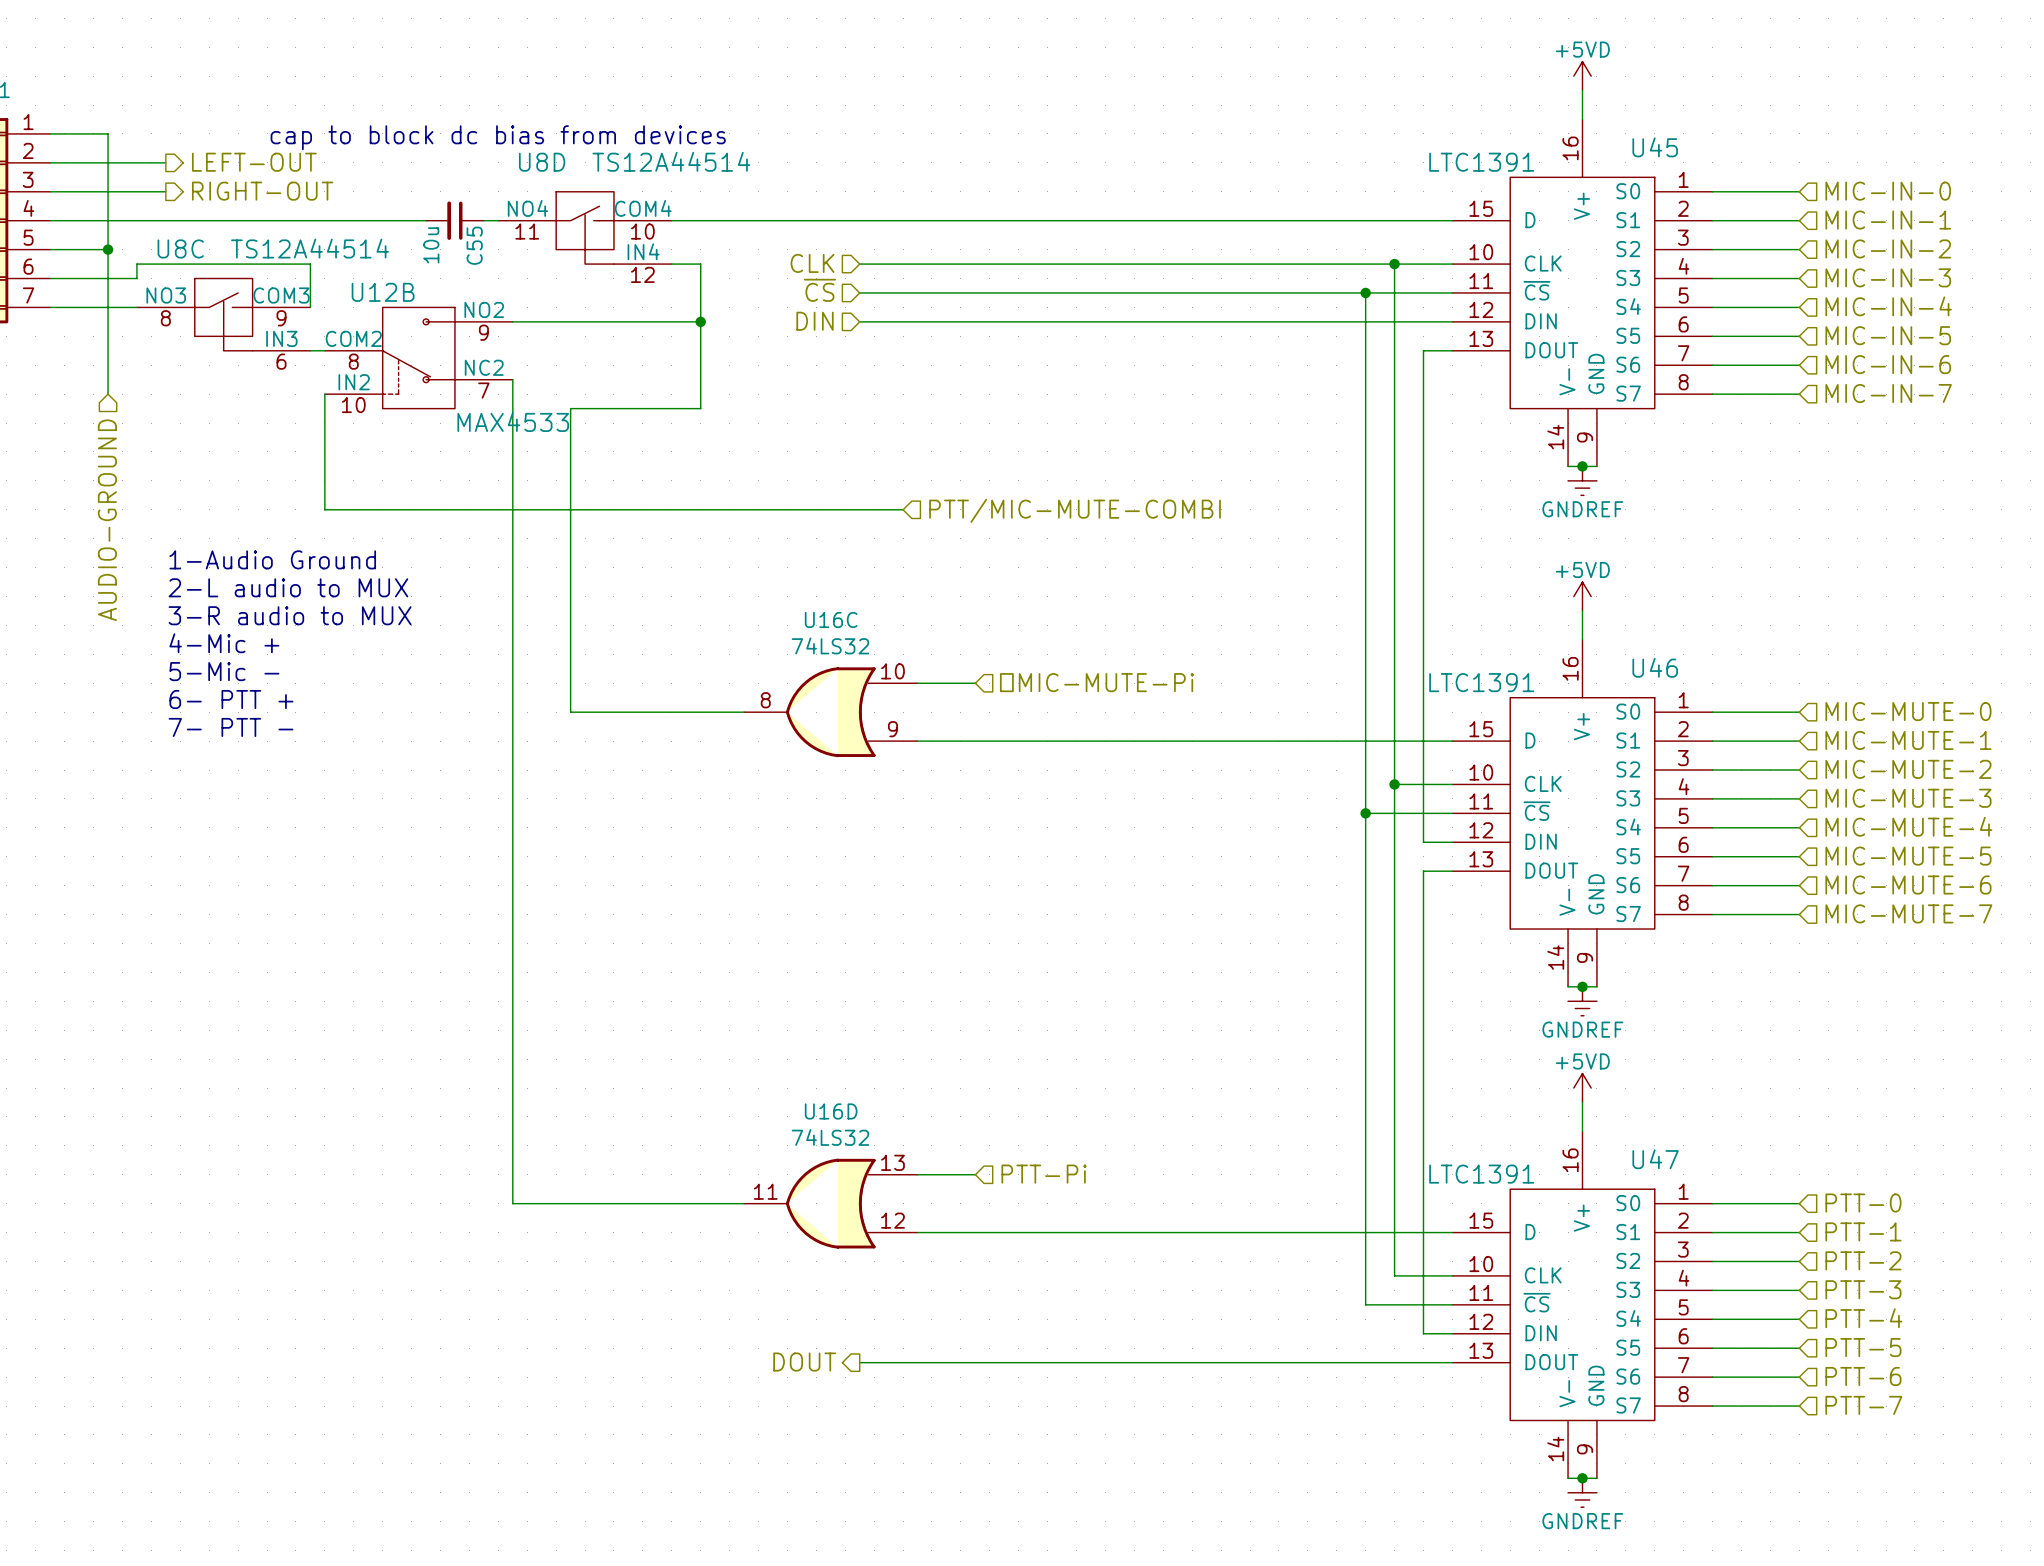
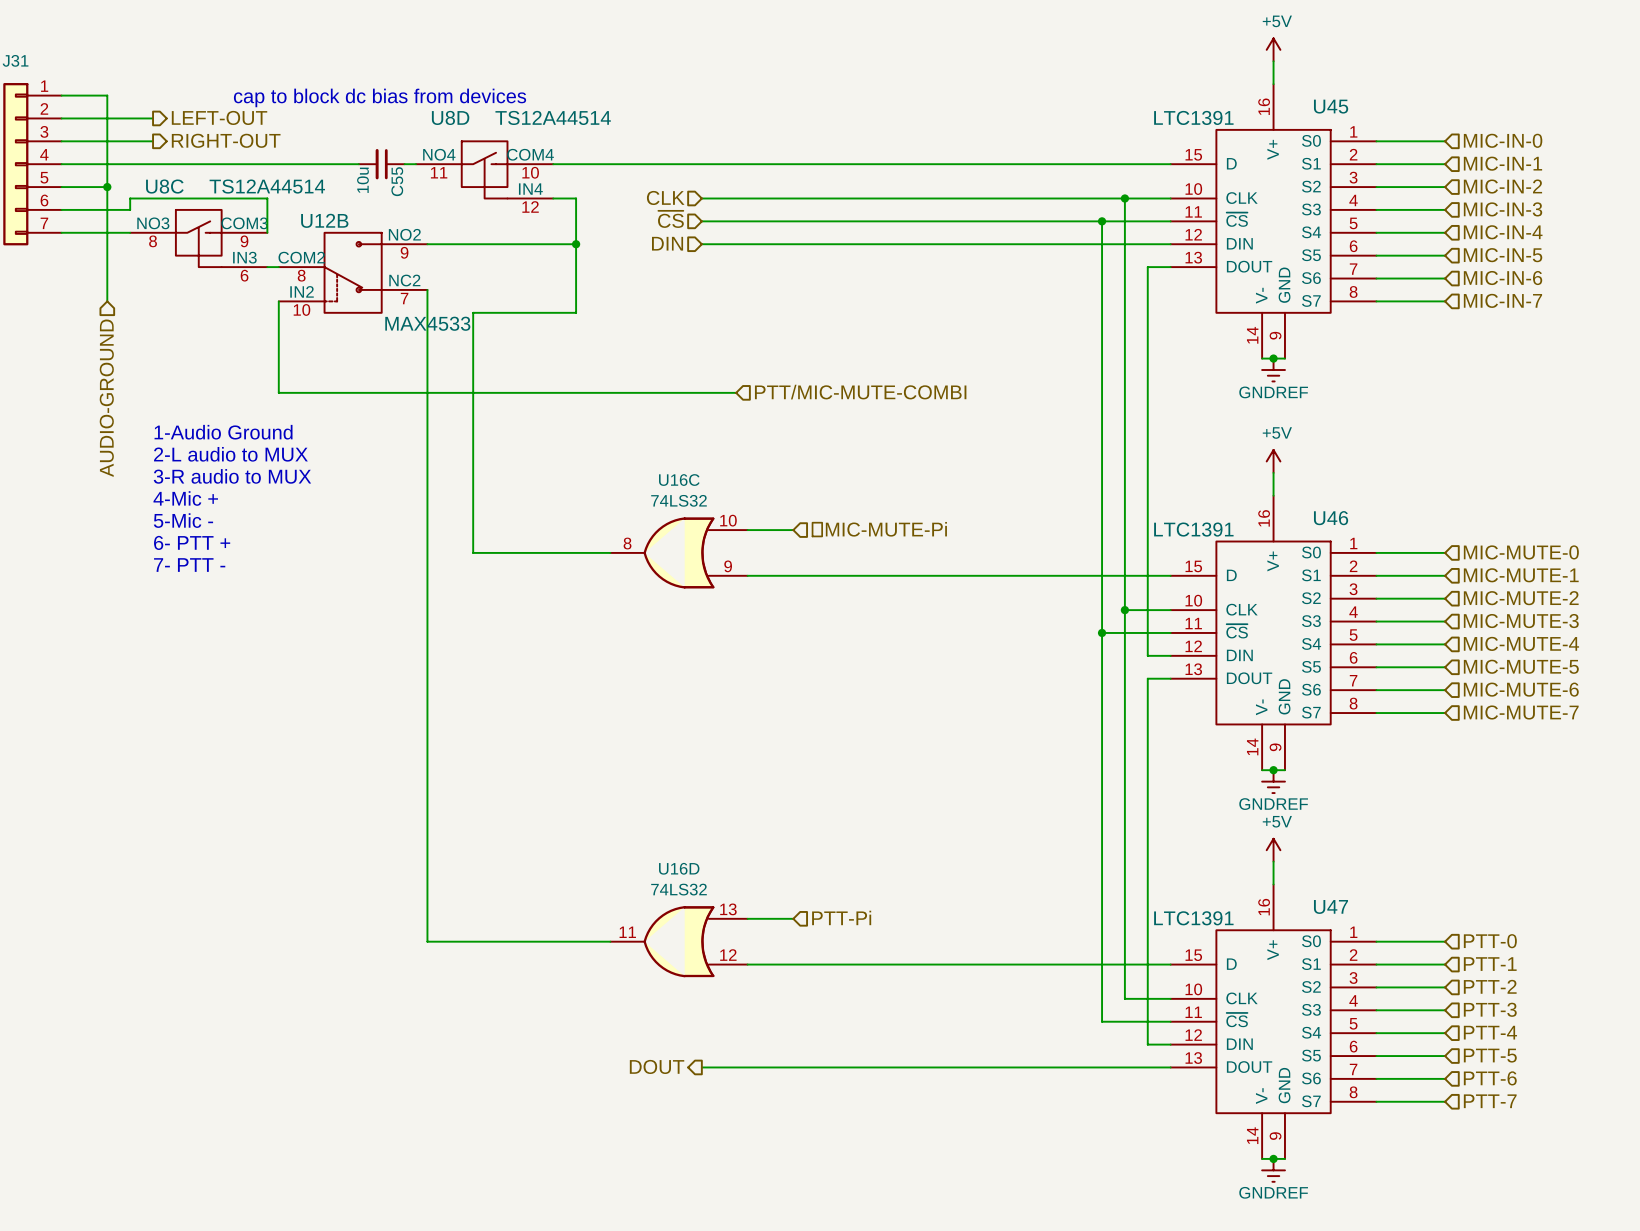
power symbol: +5VD (1582, 76) -> +5V (1273, 49)
power symbol: +5VD (1582, 596) -> +5V (1273, 461)
power symbol: +5VD (1582, 1088) -> +5V (1273, 850)

